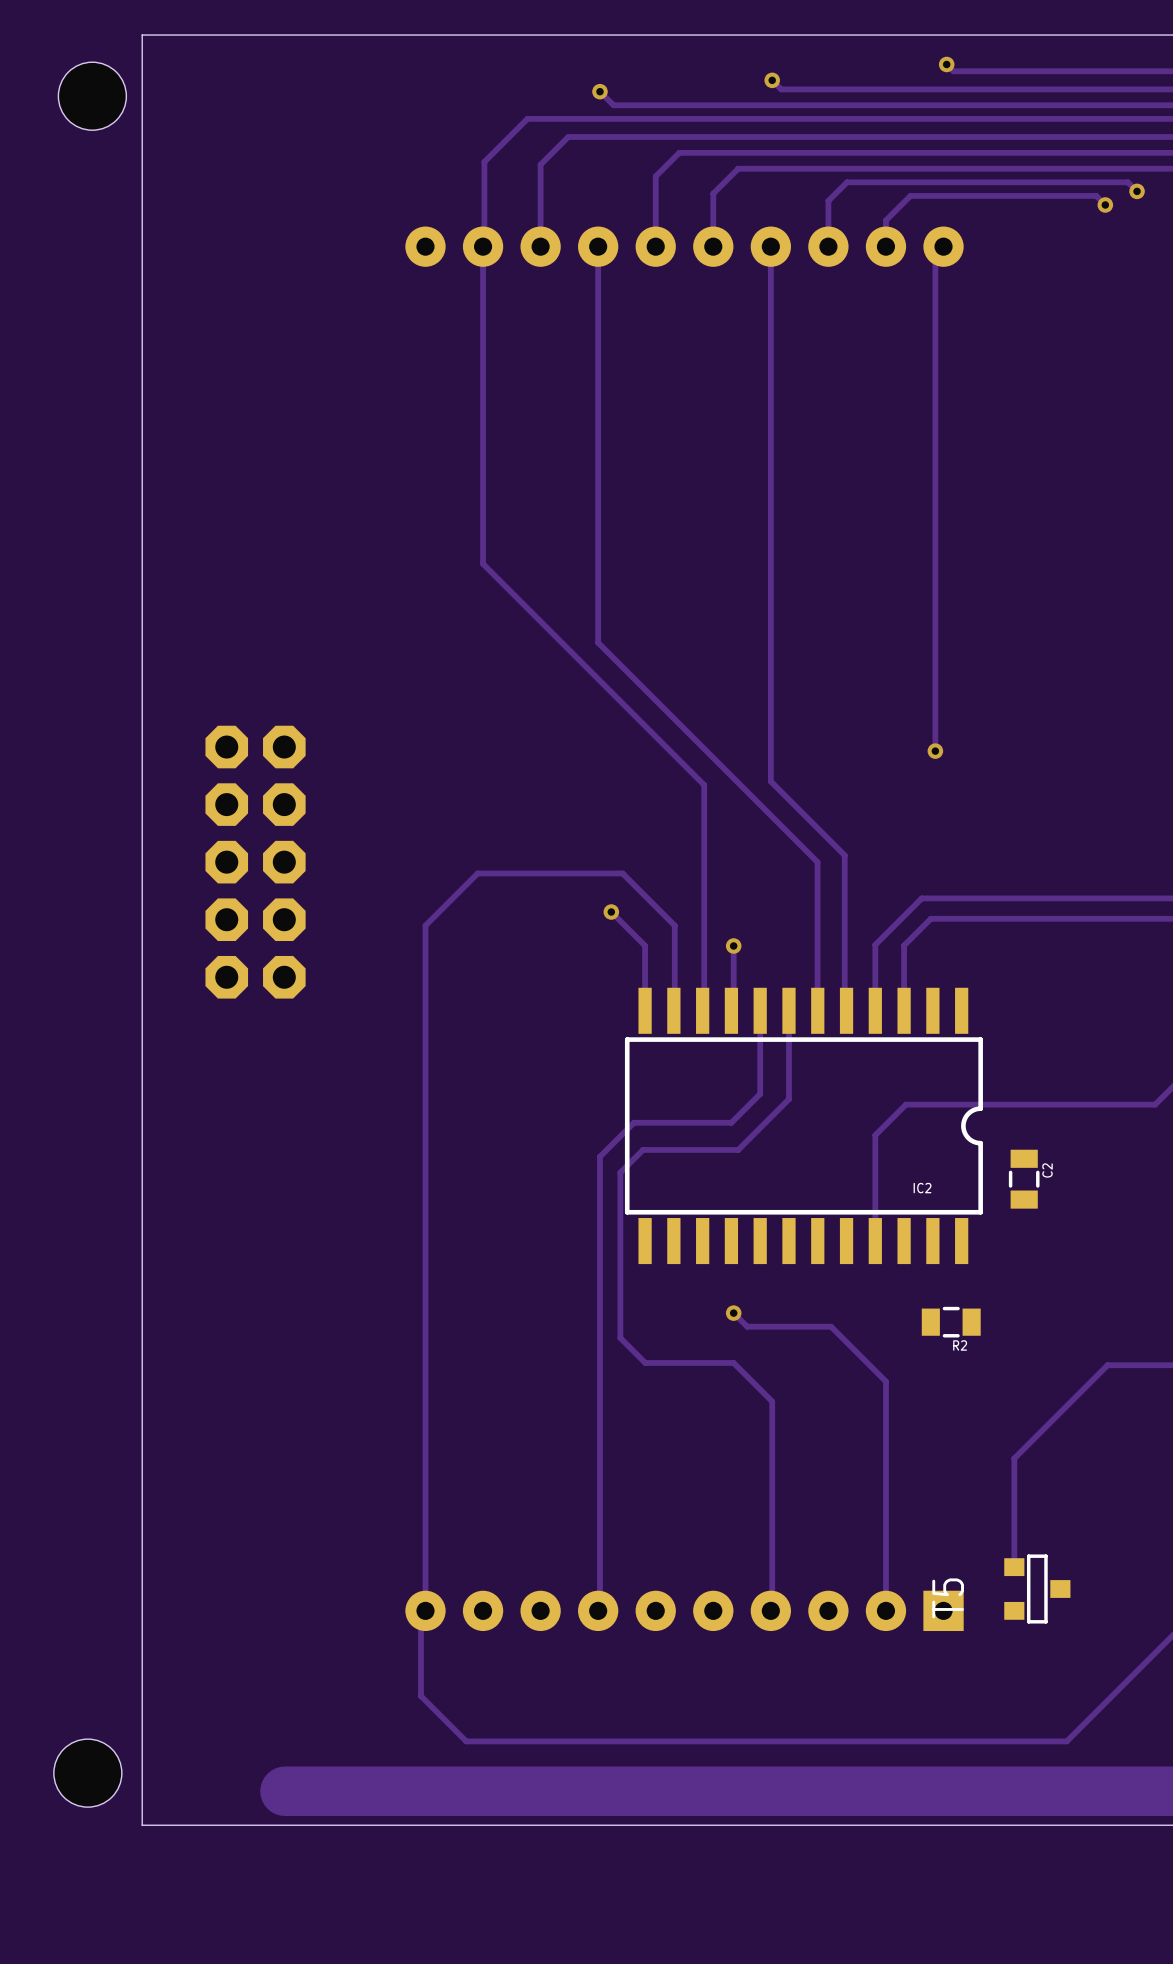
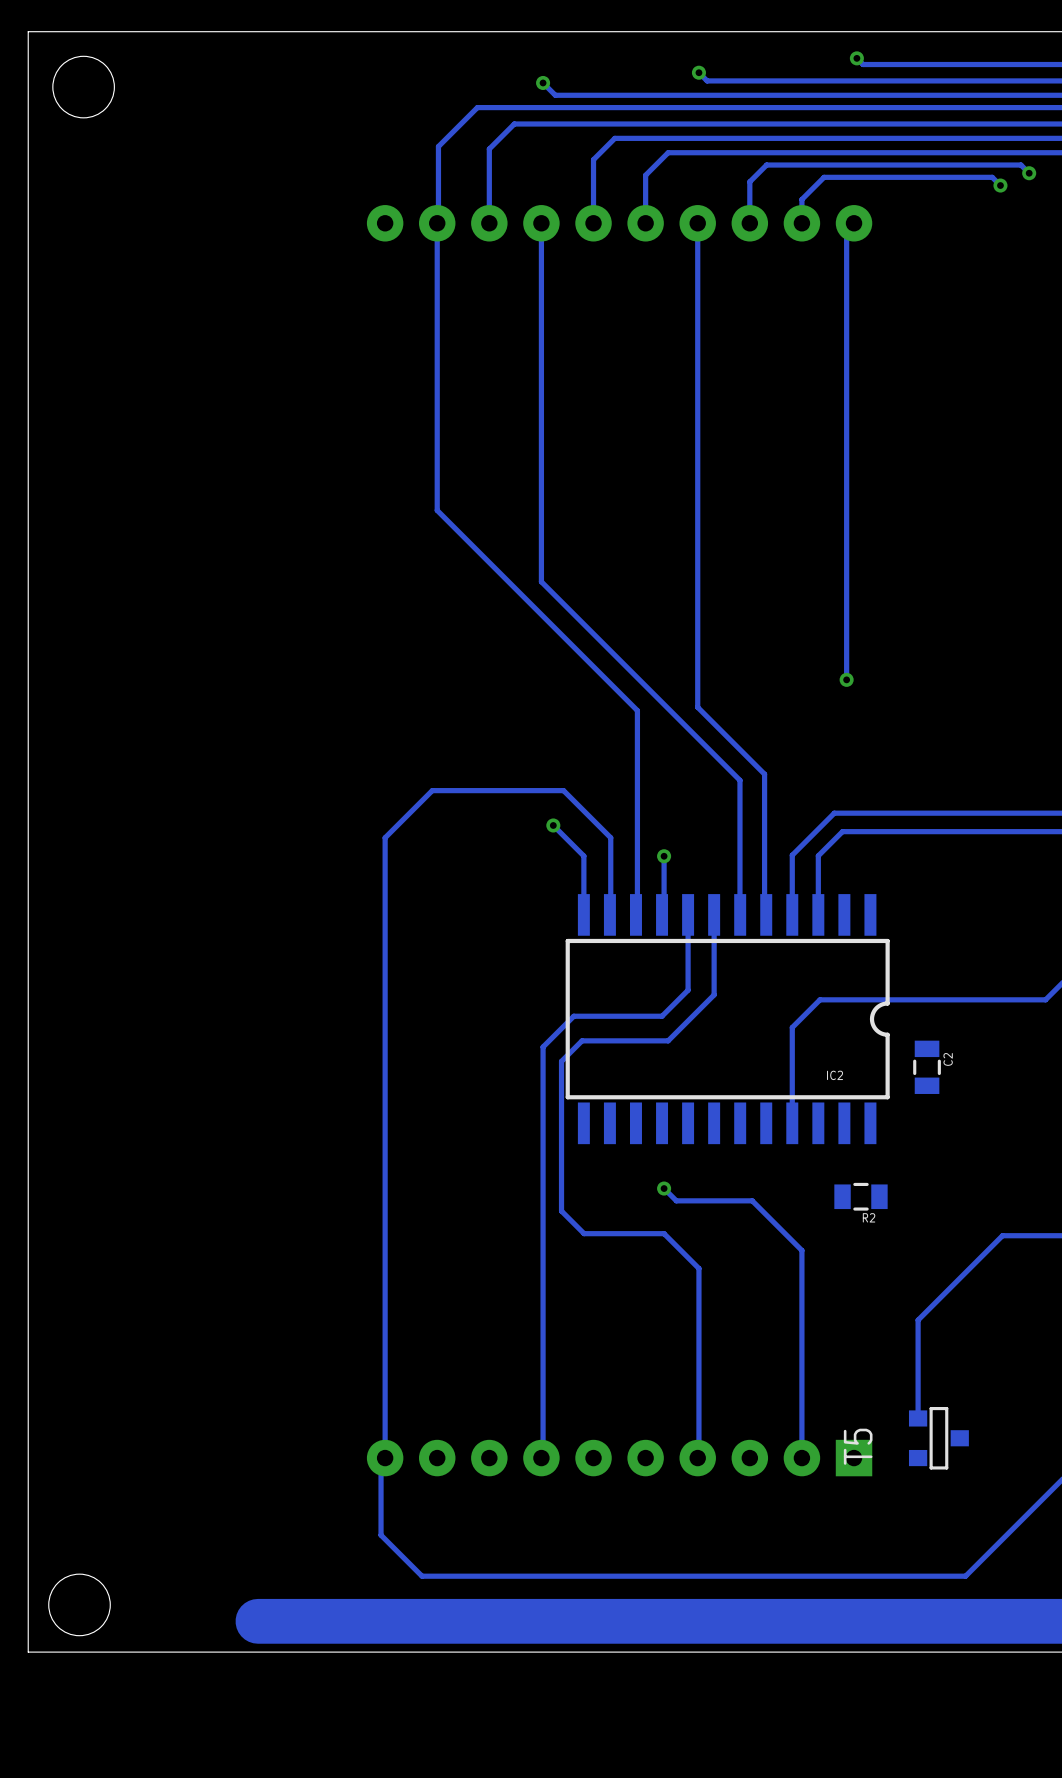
board edge: (142, 35) (142, 1825) -> (128, 31) (28, 31) (28, 1652) (128, 1652)
part: (255, 862) -> none

